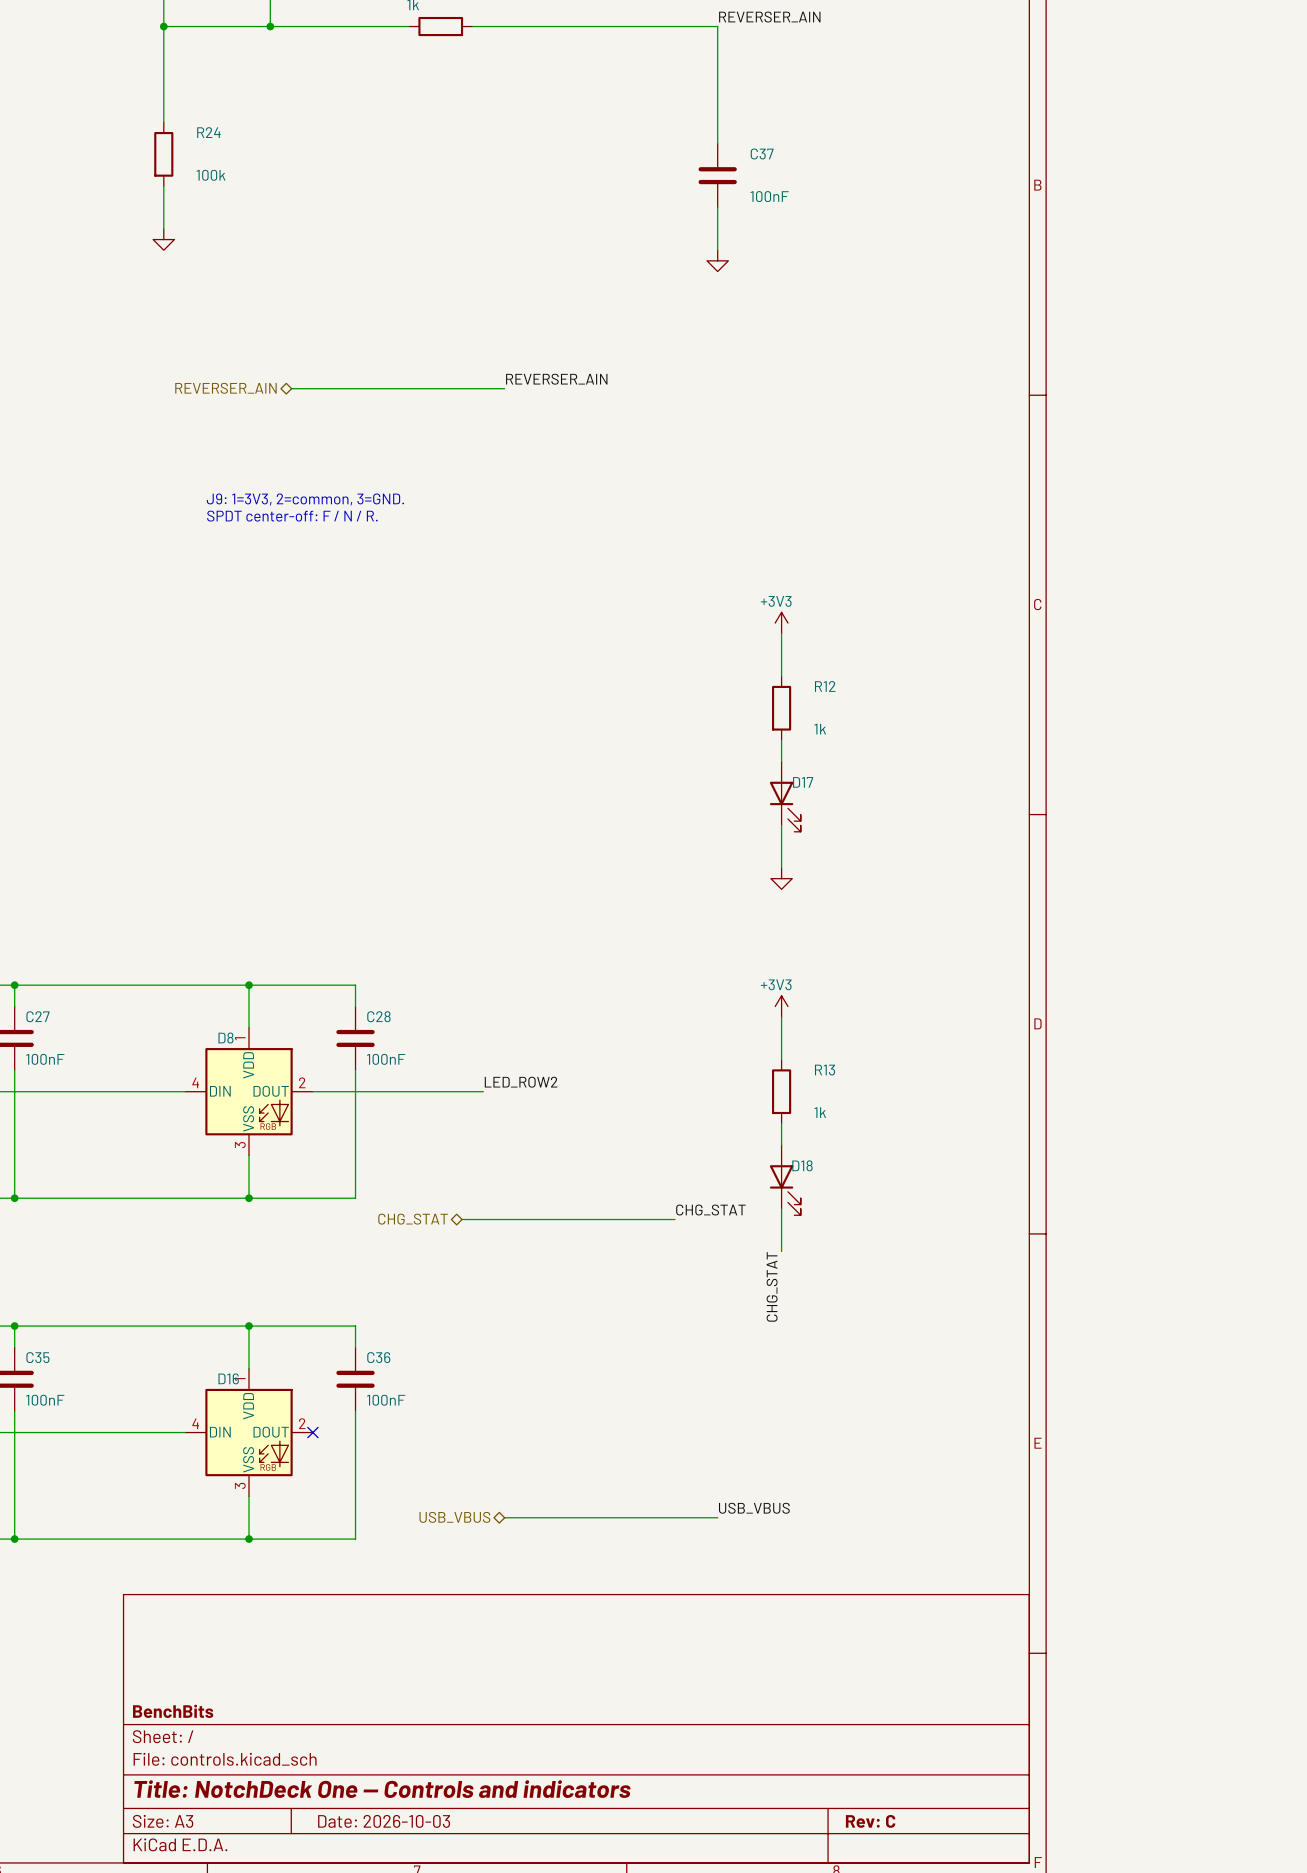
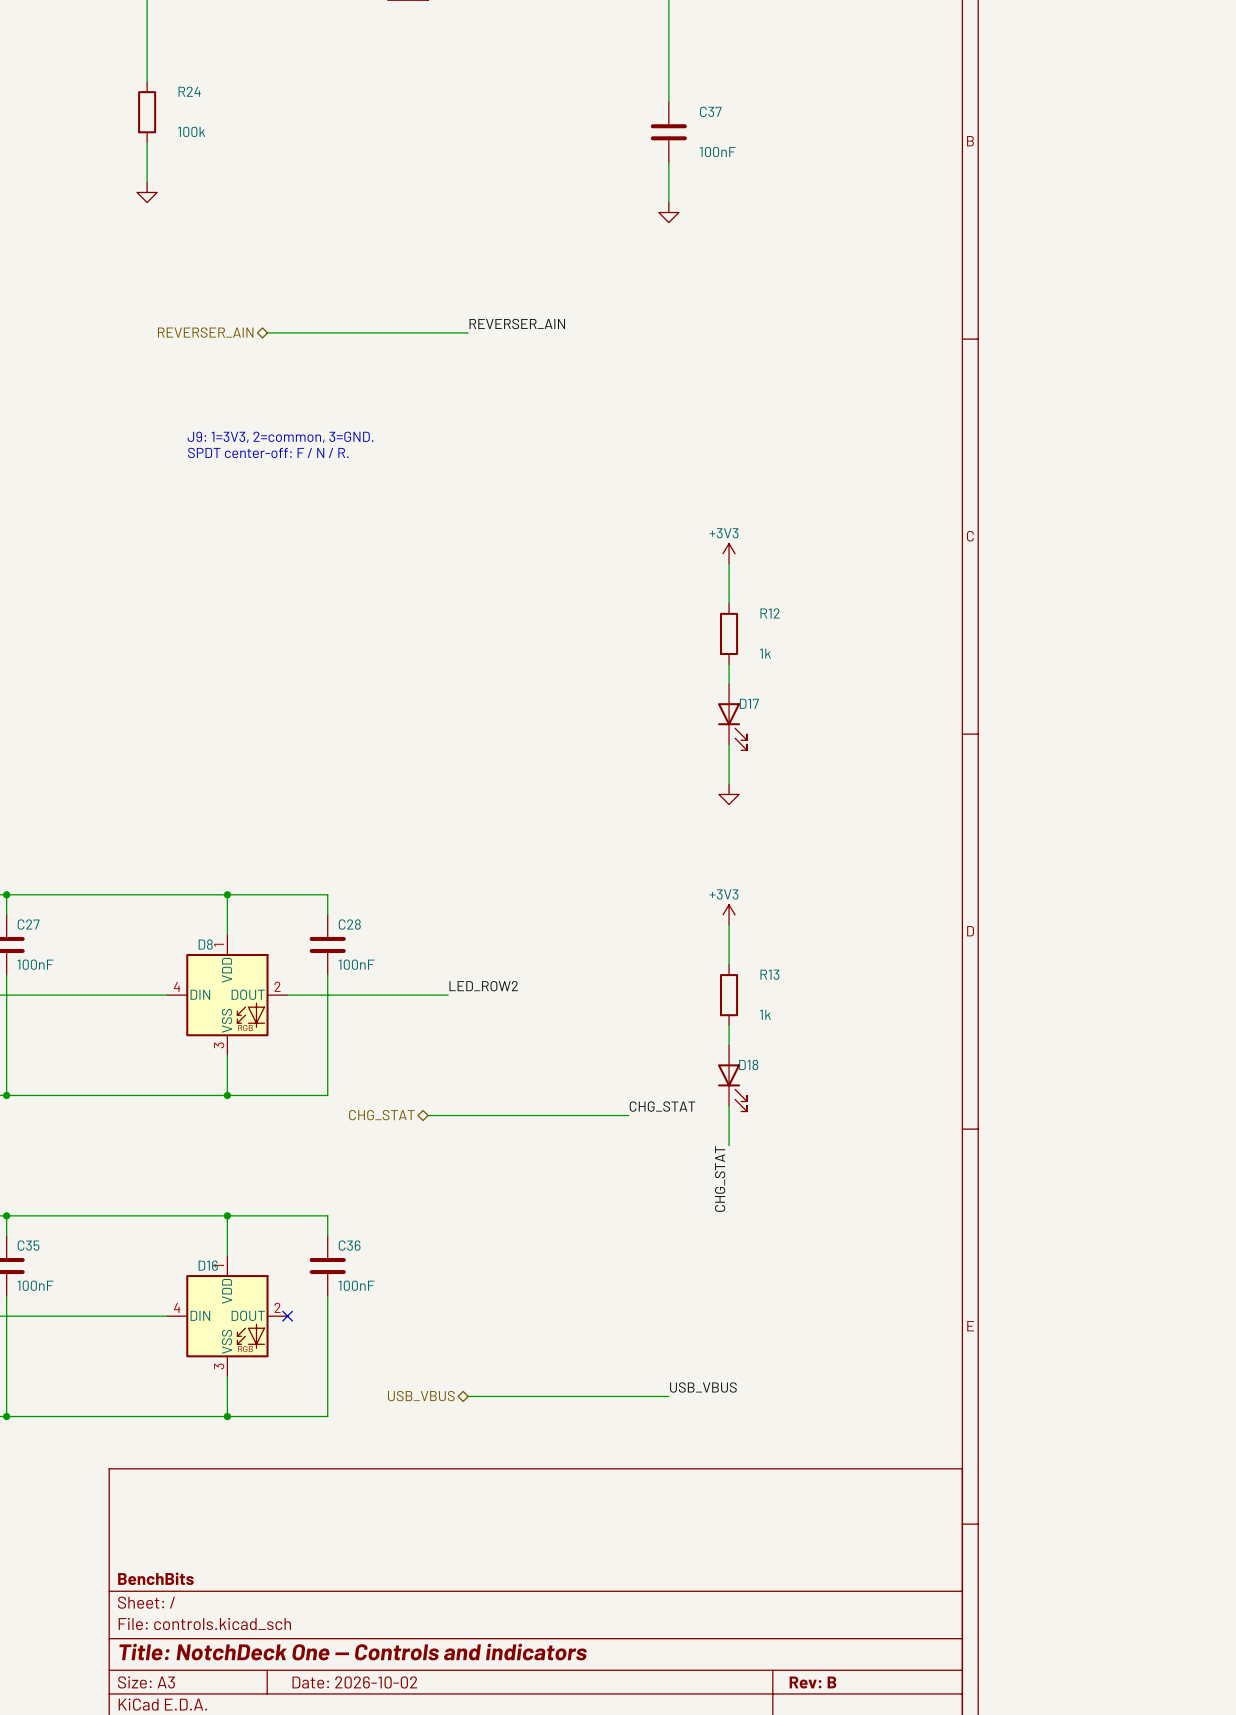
title block: Date: 2026-10-03 (384, 1821) -> Date: 2026-10-02 (354, 1682)
title block: Rev: C (870, 1821) -> Rev: B (812, 1682)

